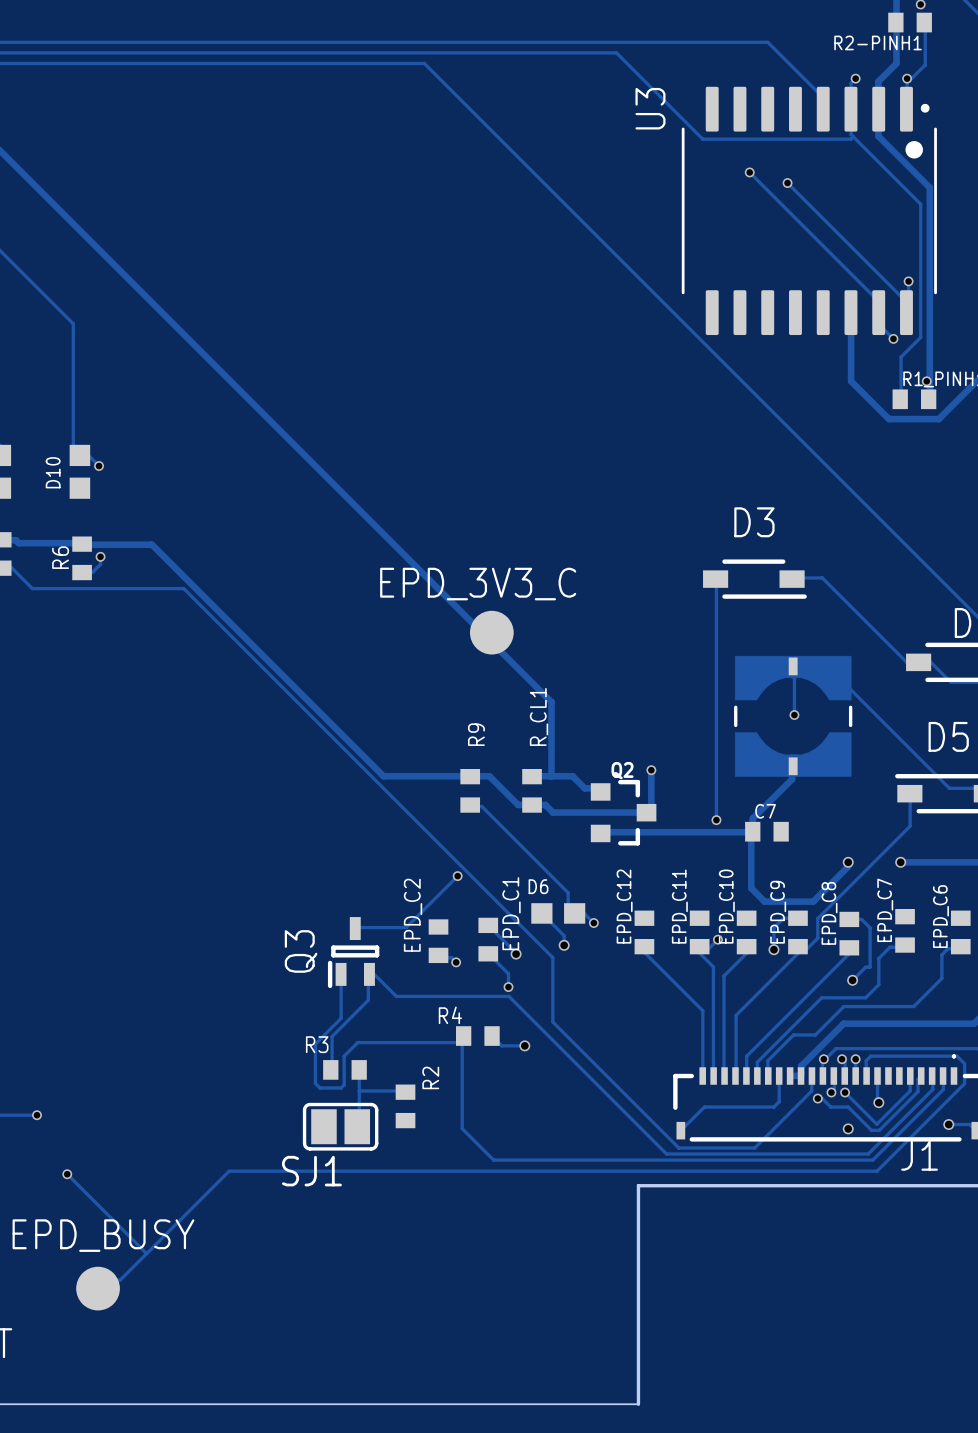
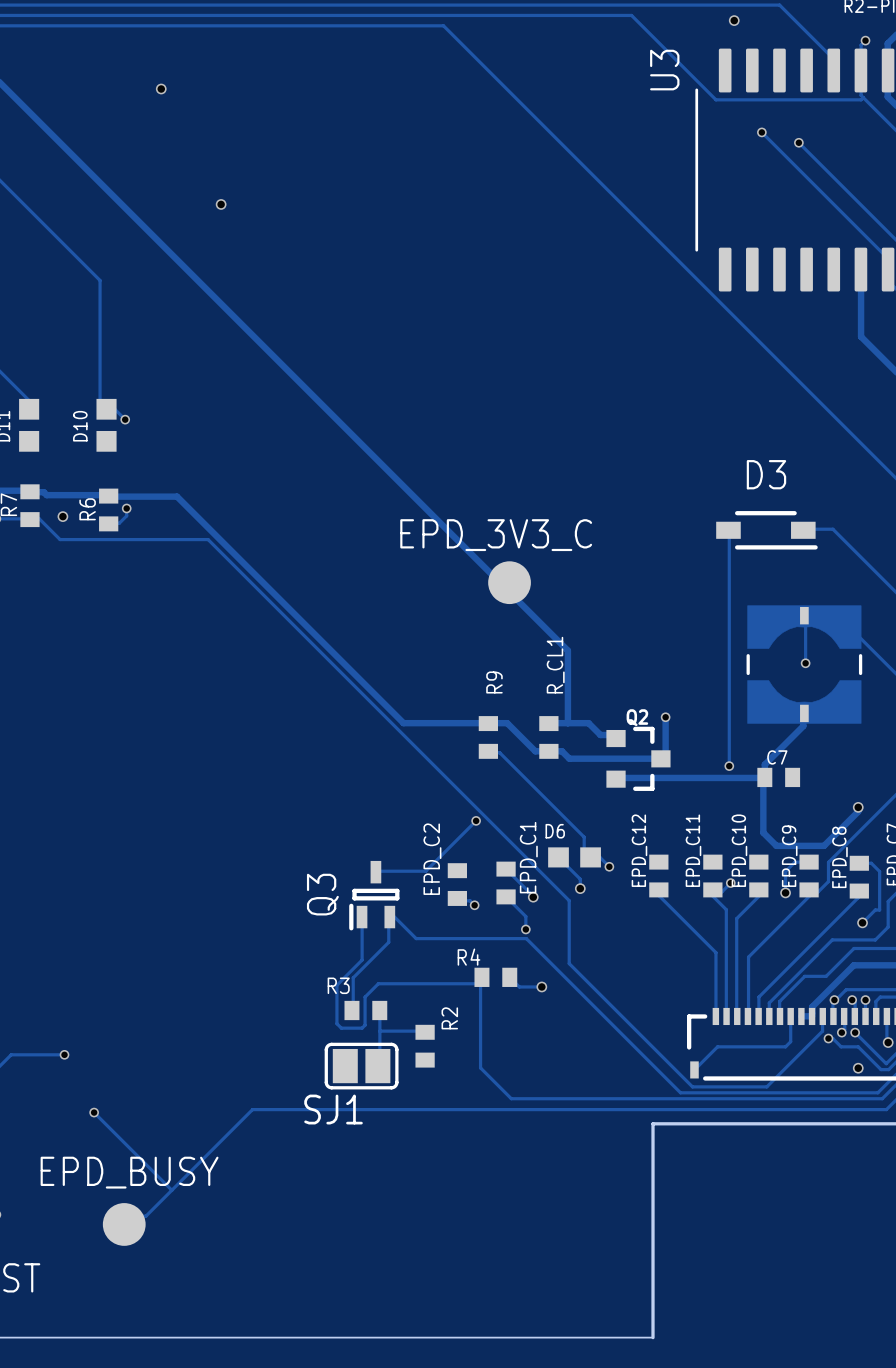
via: none -> (734, 20)
via: none -> (161, 89)
via: none -> (221, 204)
via: none -> (62, 516)

